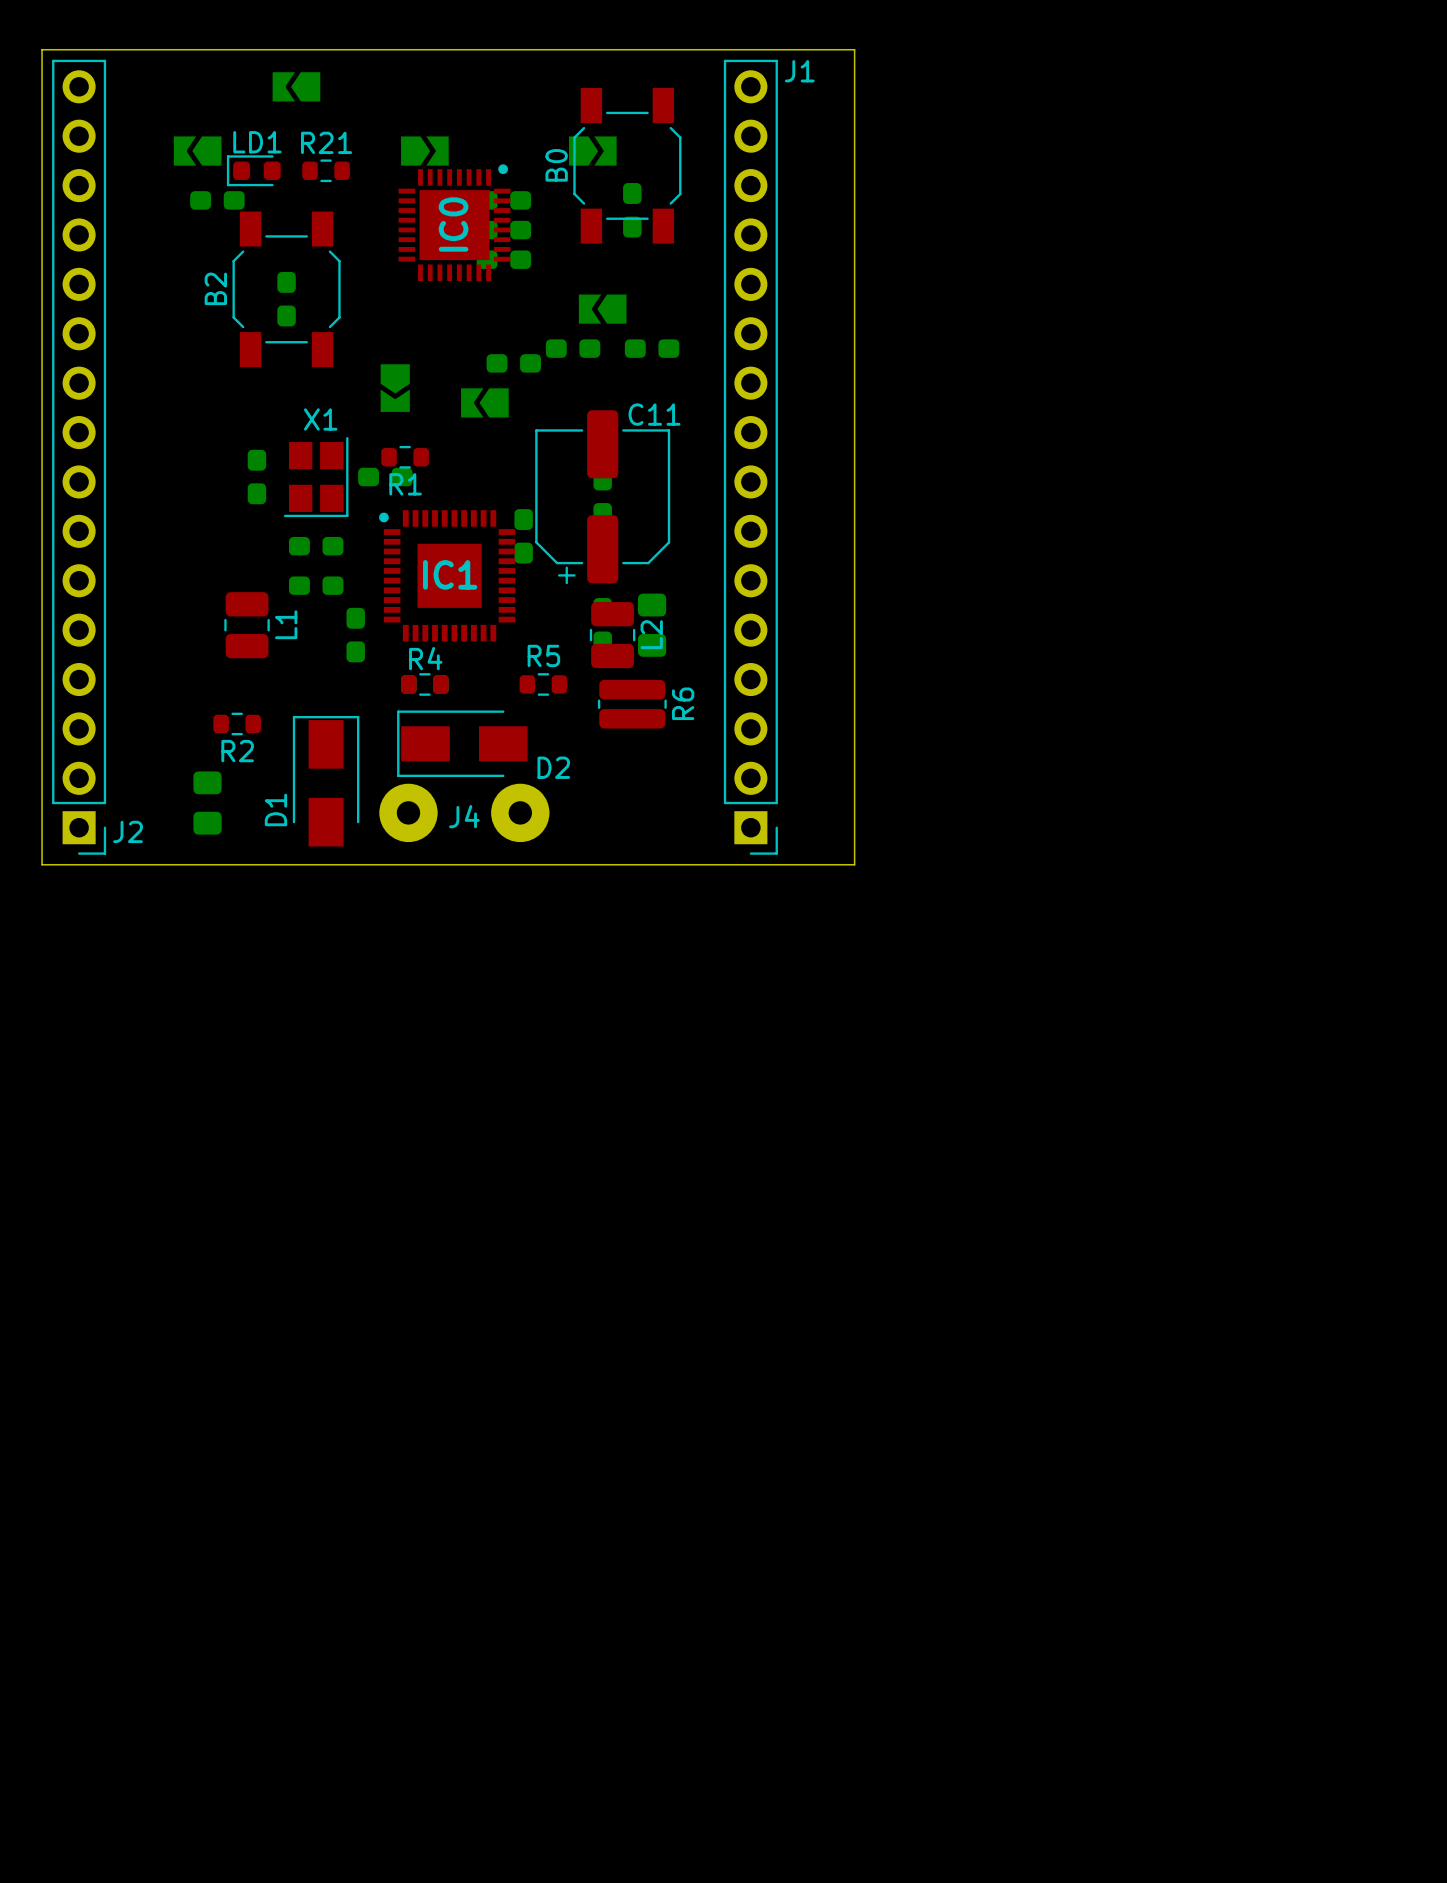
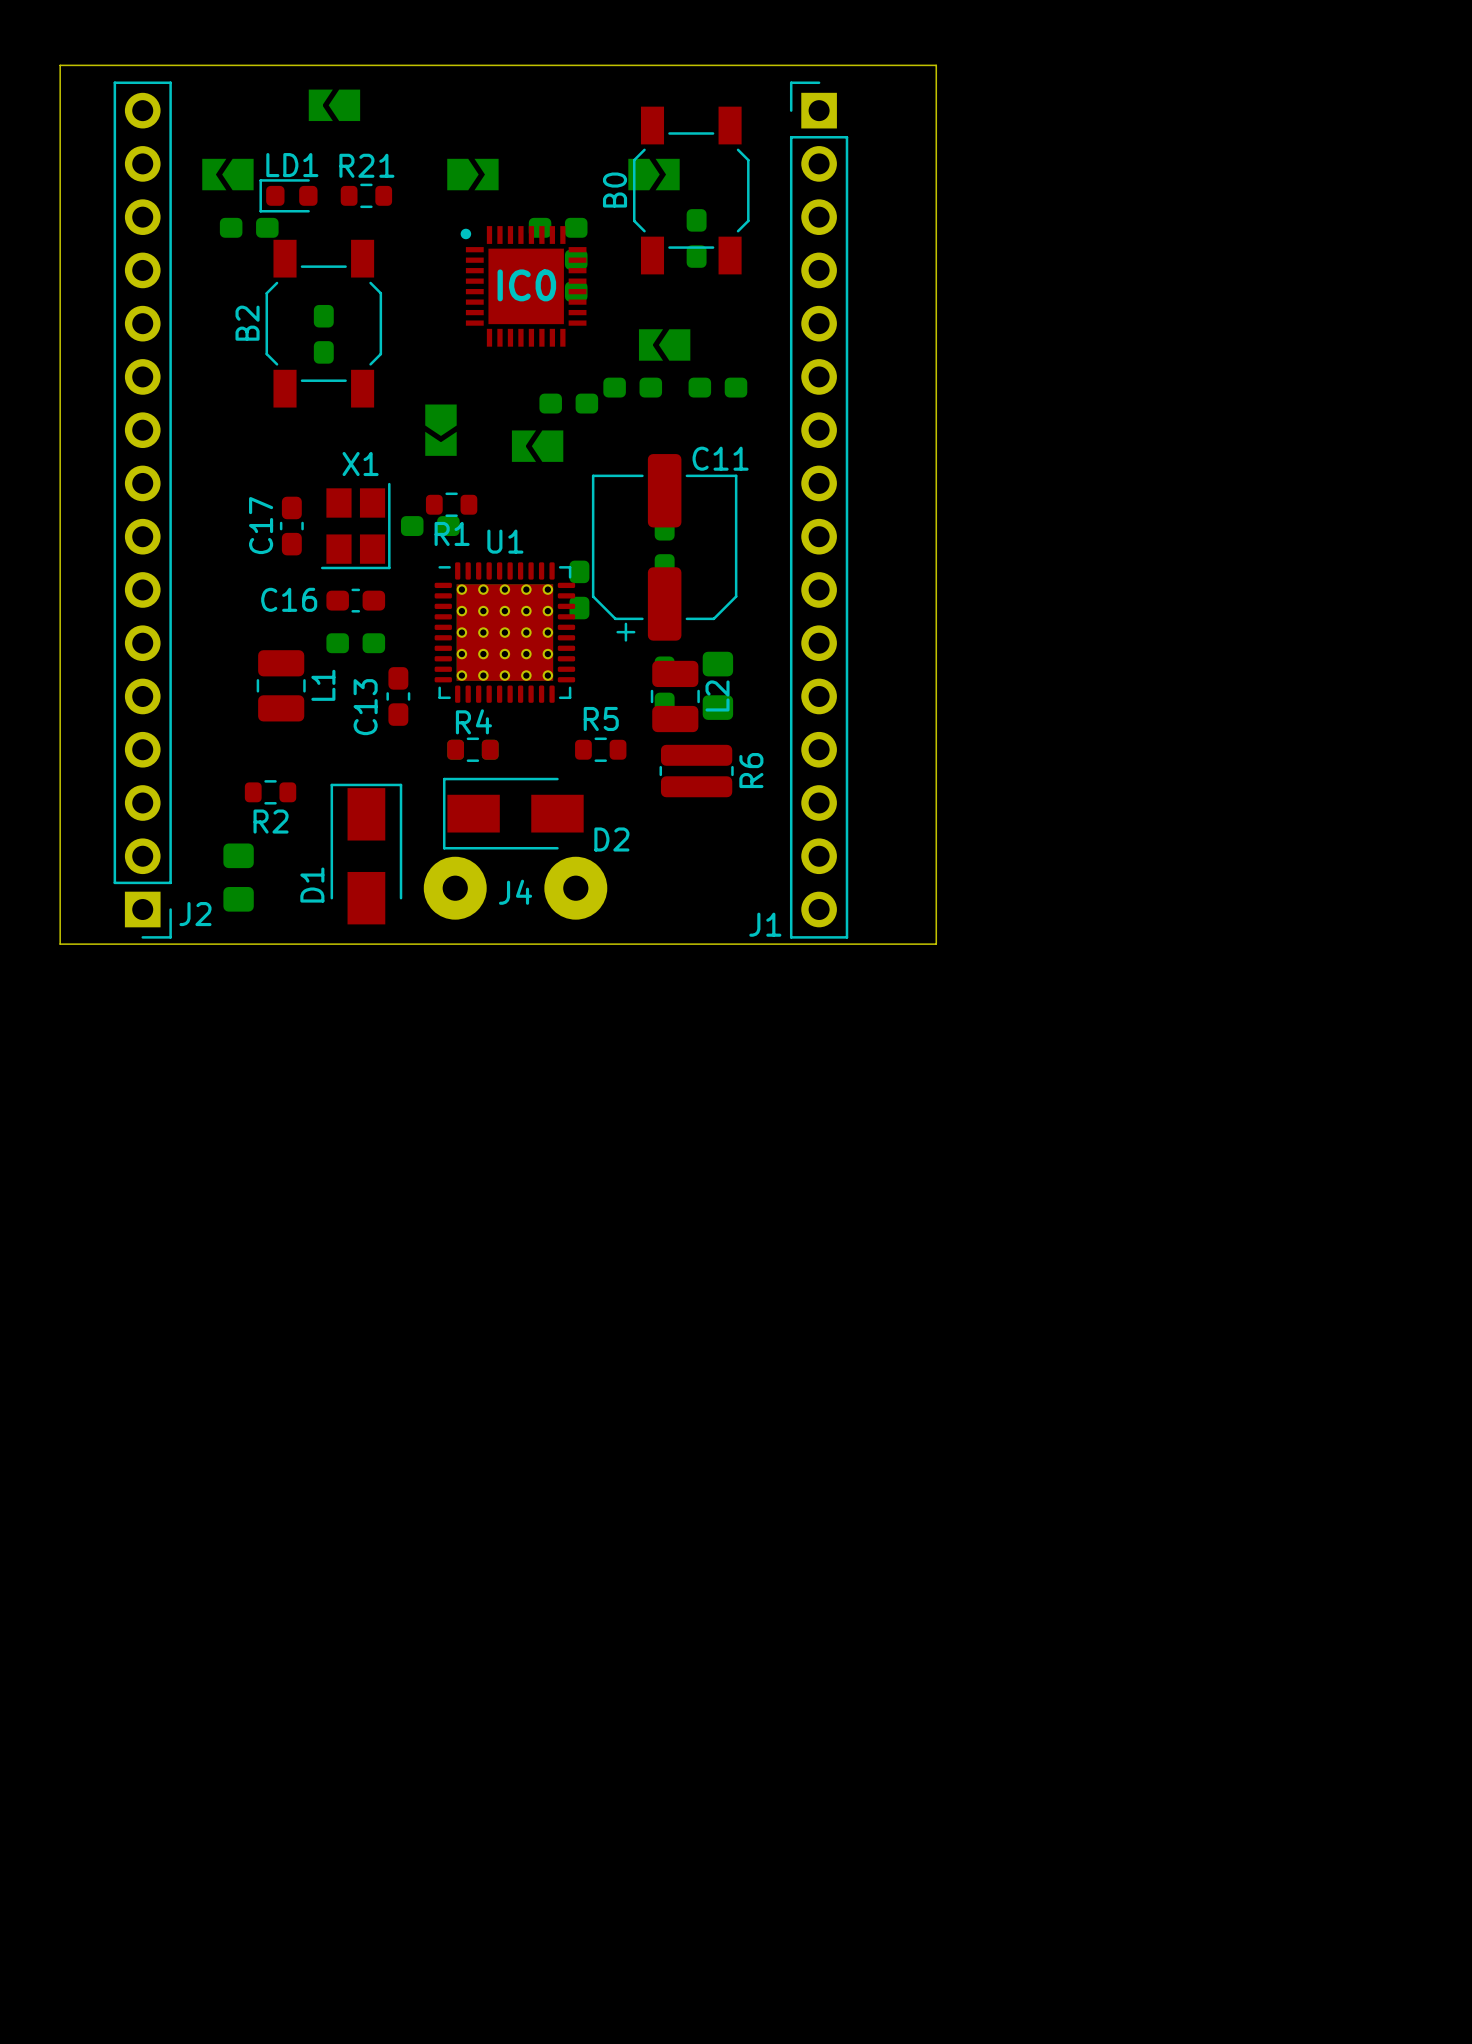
IC0 rotation: 0° (454, 222) -> 90° counterclockwise (523, 286)
J2 position: (79, 457) -> (142, 510)
J1 rotation: 0° (750, 457) -> 180° (819, 510)
C17 side: bottom (256, 477) -> top (291, 526)
C16 side: bottom (316, 546) -> top (355, 600)
IC1: (447, 575) -> none
U1: none -> (504, 632)
C13 side: bottom (355, 635) -> top (398, 696)

